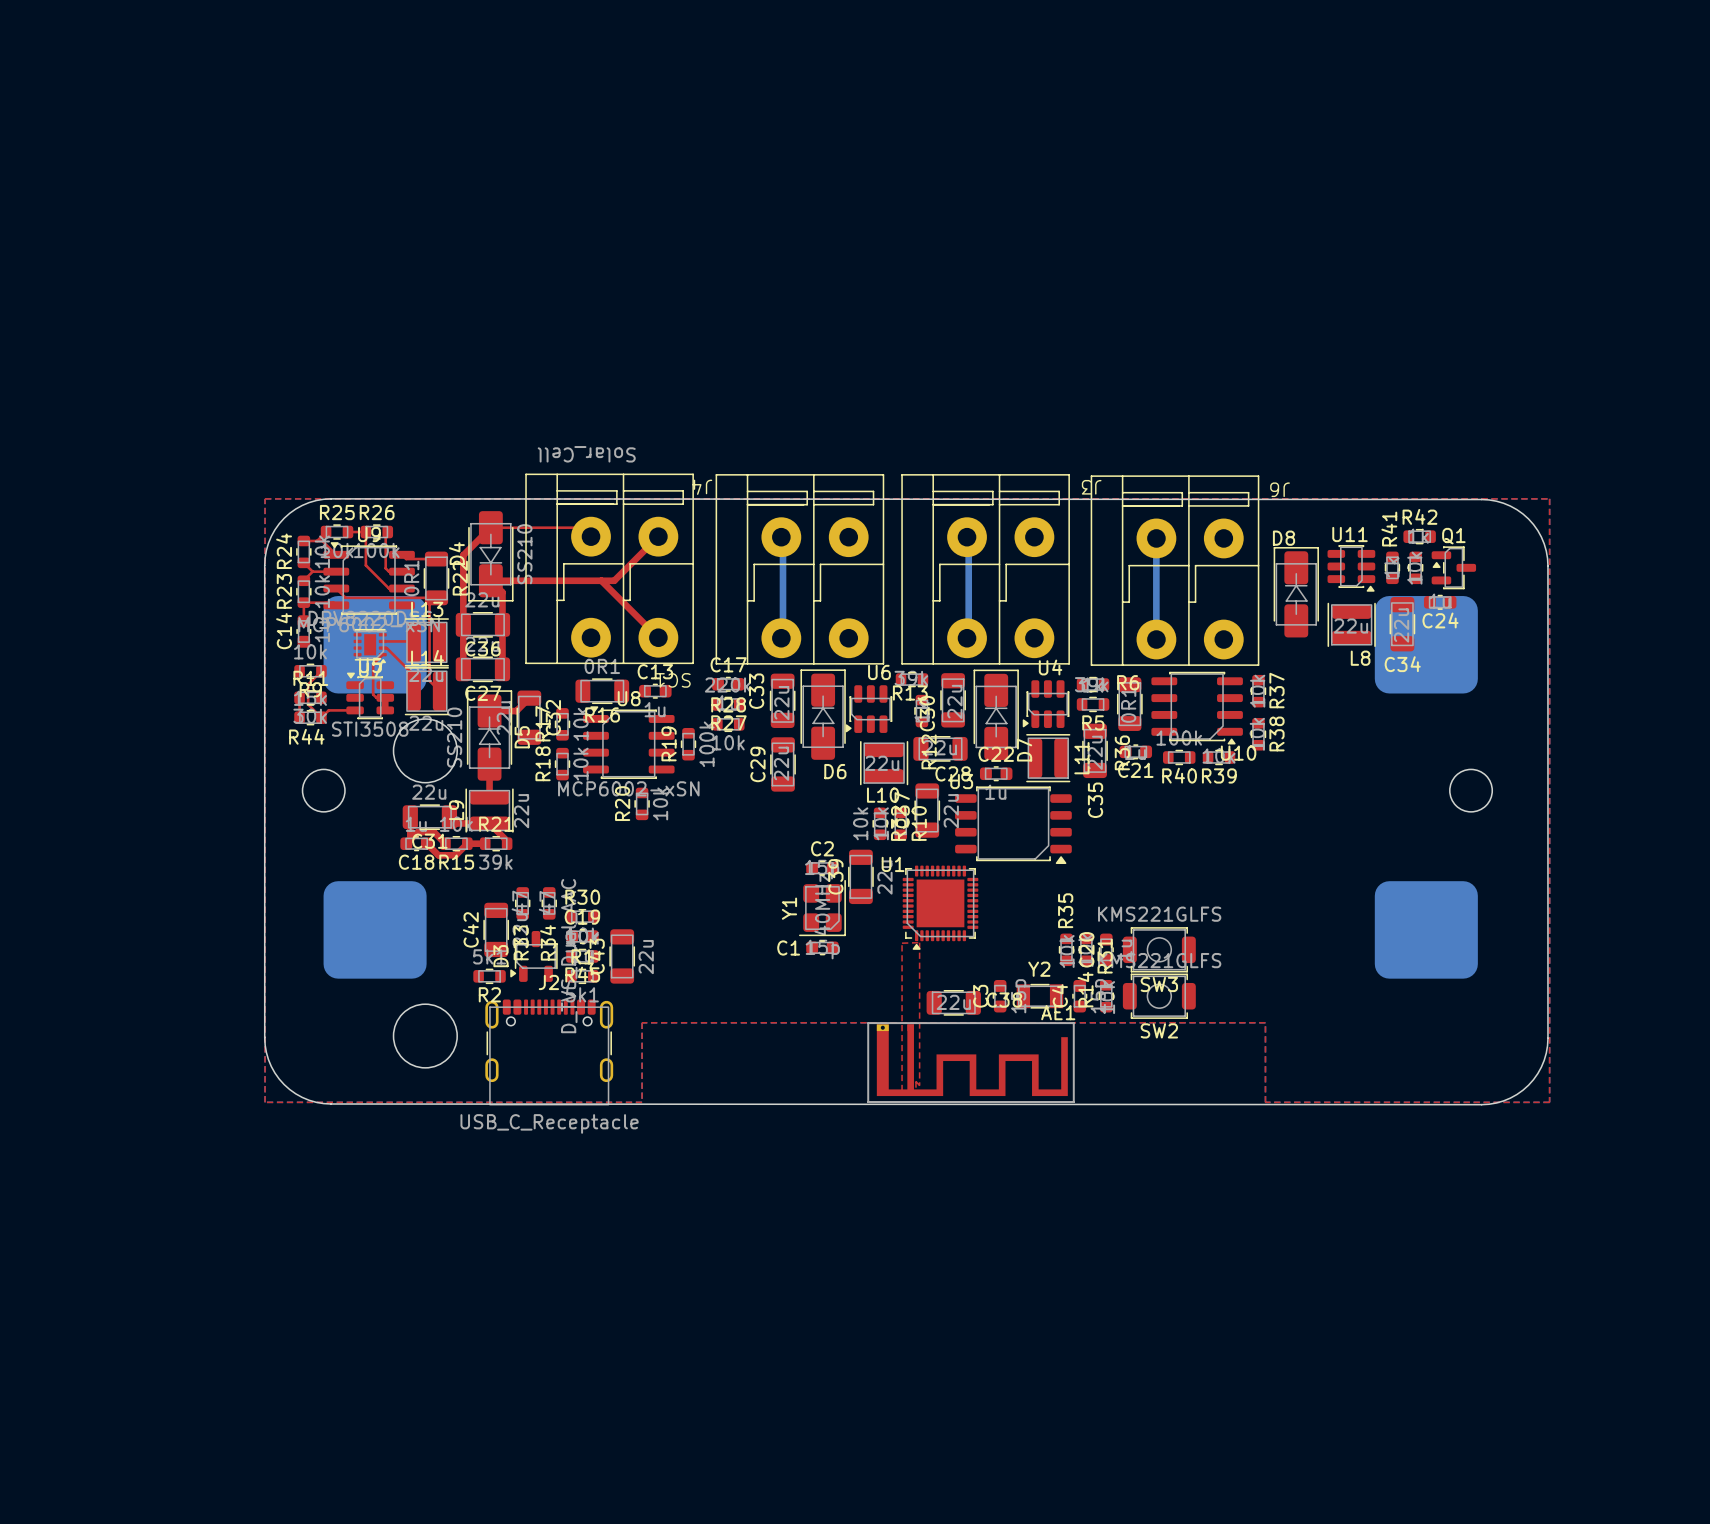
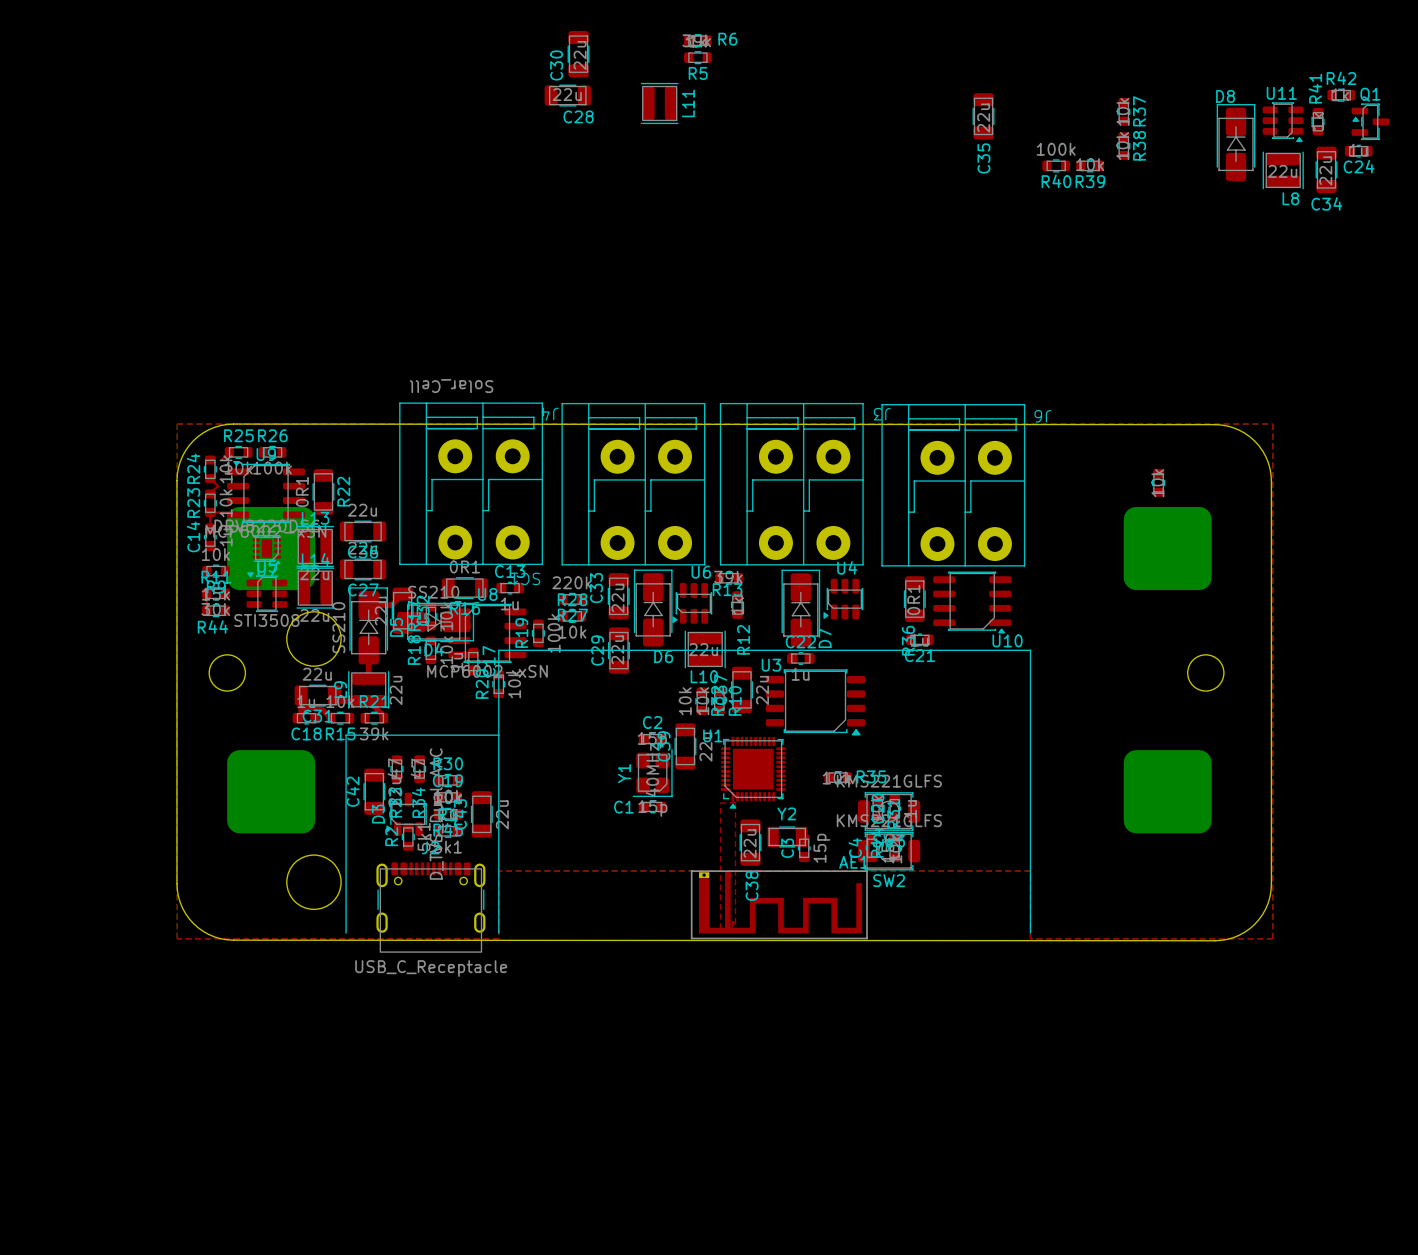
top track: (347, 532) (365, 532) (365, 565) (389, 588) (401, 588) -> none
top track: (387, 532) (385, 534) (385, 568) (389, 571) (401, 571) -> none
top track: (591, 536) (582, 527) (490, 527) (463, 555) (463, 669) -> none
top track: (658, 536) (614, 580) (490, 580) (502, 592) (502, 669) -> none
R42 position: (1419, 536) -> (1341, 95)
bottom track: (783, 538) (783, 639) -> none
bottom track: (968, 538) (968, 639) -> none
bottom track: (1156, 538) (1156, 639) -> none
top track: (303, 540) (322, 540) (336, 554) -> none
top track: (401, 554) (406, 559) (436, 559) -> none
D4 rotation: 0° (490, 556) -> 90° counterclockwise (435, 622)
D4 position: (490, 556) -> (435, 622)
R41 position: (1392, 567) -> (1318, 121)
Q1 position: (1453, 567) -> (1370, 121)
U11 position: (1351, 568) -> (1283, 122)
top track: (312, 571) (336, 571) -> none
top track: (601, 580) (658, 637) -> none
top track: (336, 588) (345, 597) (436, 597) -> none
D8 position: (1296, 592) -> (1236, 142)
top track: (436, 597) (429, 604) (429, 680) (439, 691) -> none
C24 position: (1440, 602) -> (1358, 151)
L8 position: (1351, 624) -> (1283, 170)
C34 position: (1402, 624) -> (1326, 169)
top track: (382, 641) (413, 642) -> none
top track: (382, 648) (386, 648) (413, 675) (413, 691) -> none
top track: (382, 654) (373, 664) (373, 694) (376, 697) (385, 697) (385, 710) -> none
top track: (321, 671) (308, 684) (308, 704) (321, 717) (328, 710) (355, 710) -> none
C17 rotation: 0° (728, 684) -> 90° clockwise (473, 661)
C17 position: (728, 684) -> (473, 661)
R6 position: (1093, 684) -> (697, 40)
R37 position: (1258, 691) -> (1123, 111)
C30 position: (953, 700) -> (578, 54)
R5 position: (1093, 704) -> (697, 57)
R38 position: (1258, 734) -> (1123, 146)
C28 position: (940, 748) -> (567, 95)
C35 position: (1095, 750) -> (983, 116)
R40 position: (1179, 757) -> (1056, 165)
R39 position: (1219, 757) -> (1090, 165)
L11 position: (1048, 758) -> (659, 103)
top track: (426, 843) (438, 855) (455, 855) (467, 843) (485, 843) -> none
line: none -> (498, 735) (346, 735) (346, 933)
R35 rotation: 0° (1066, 949) -> 90° clockwise (838, 777)
R35 position: (1066, 949) -> (838, 777)
SW3 position: (1159, 949) -> (889, 811)
R2 rotation: 0° (489, 976) -> 90° clockwise (408, 836)
R2 position: (489, 976) -> (408, 836)
Y2 position: (1039, 996) -> (787, 836)
SW2 position: (1159, 996) -> (889, 851)
C38 rotation: 0° (953, 1002) -> 90° clockwise (750, 842)
J2 position: (549, 1052) -> (430, 907)
line: none -> (498, 933) (498, 650) (1030, 650) (1030, 933)

